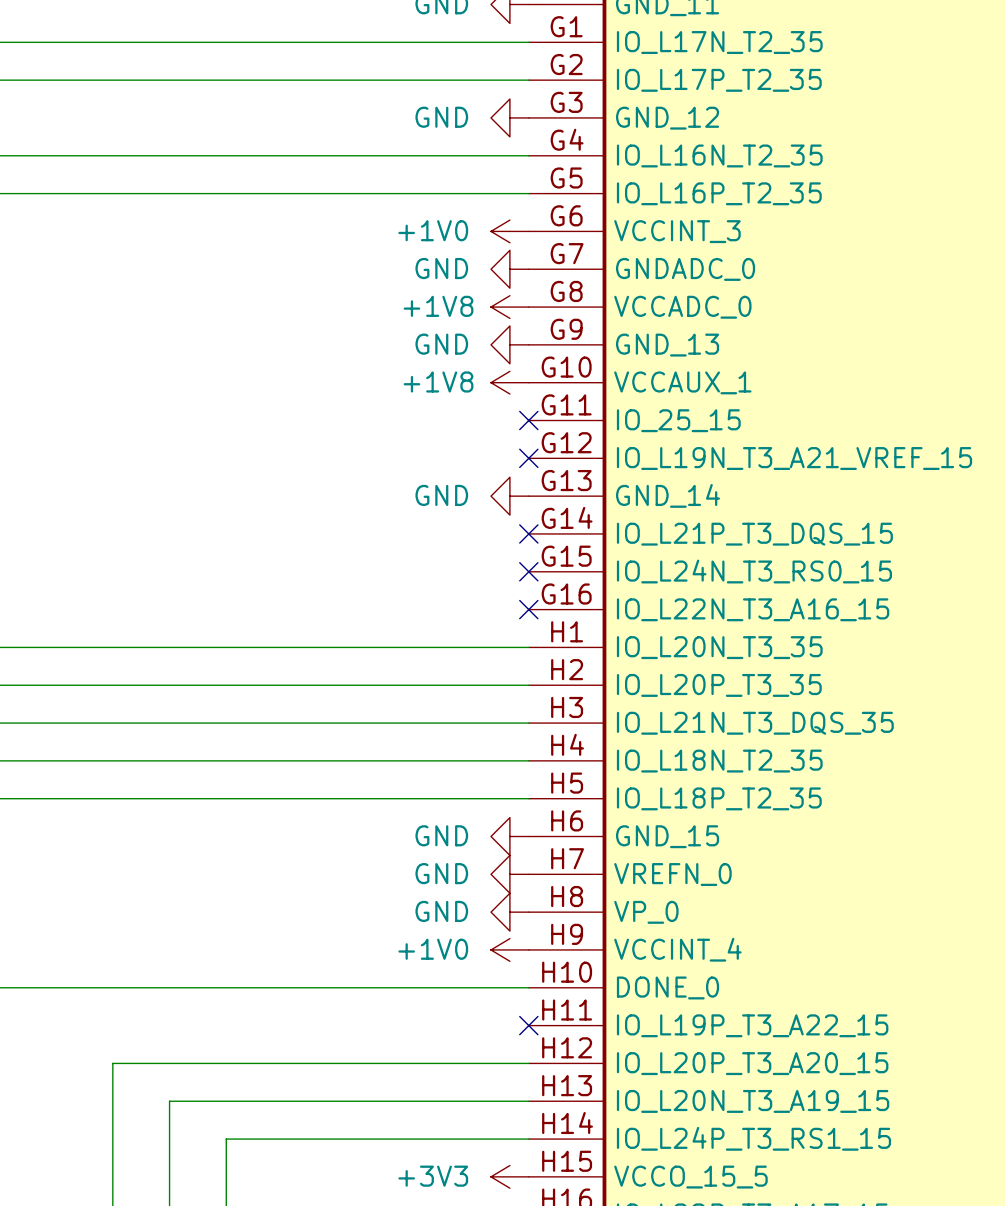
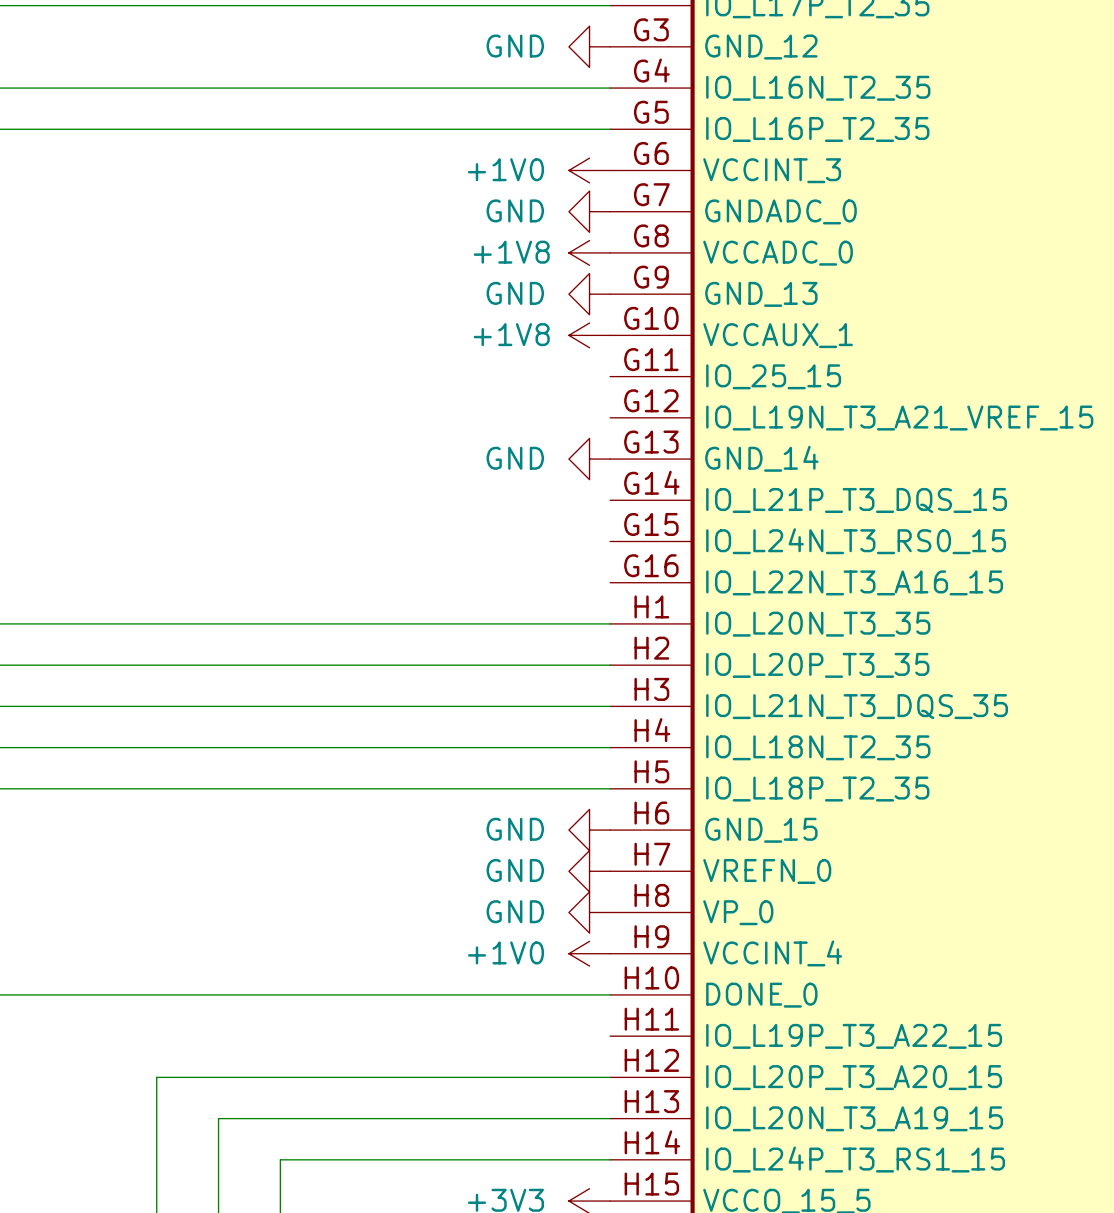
no-connect mark: (528, 420) -> none
no-connect mark: (528, 458) -> none
no-connect mark: (528, 533) -> none
no-connect mark: (528, 571) -> none
no-connect mark: (528, 609) -> none
no-connect mark: (528, 1025) -> none

